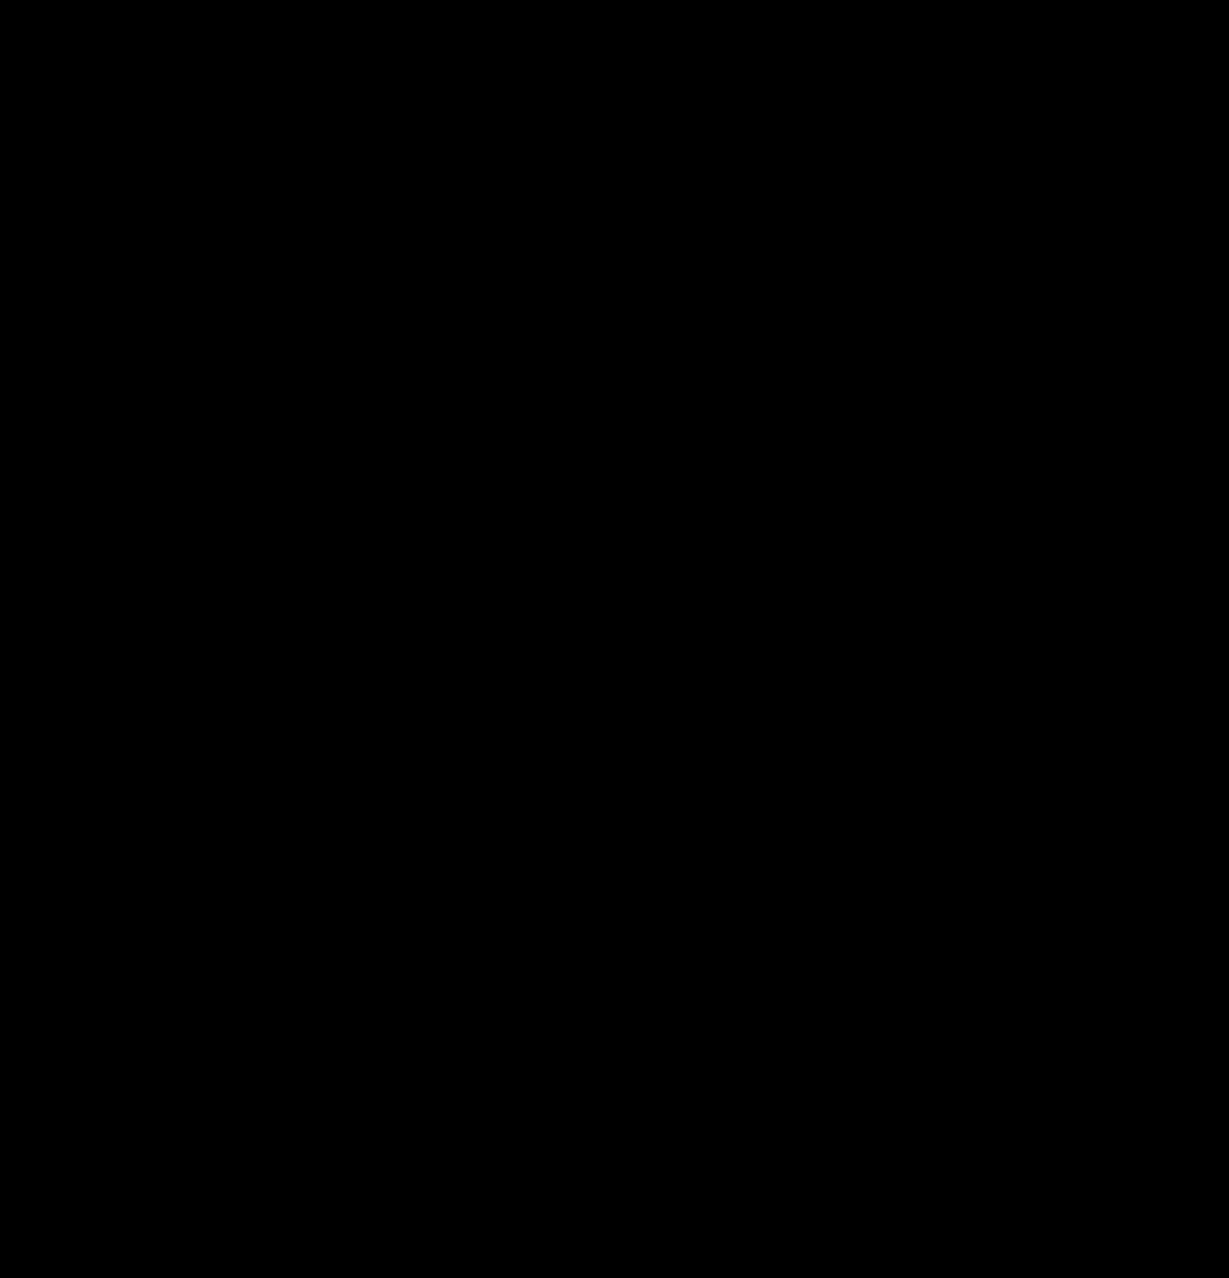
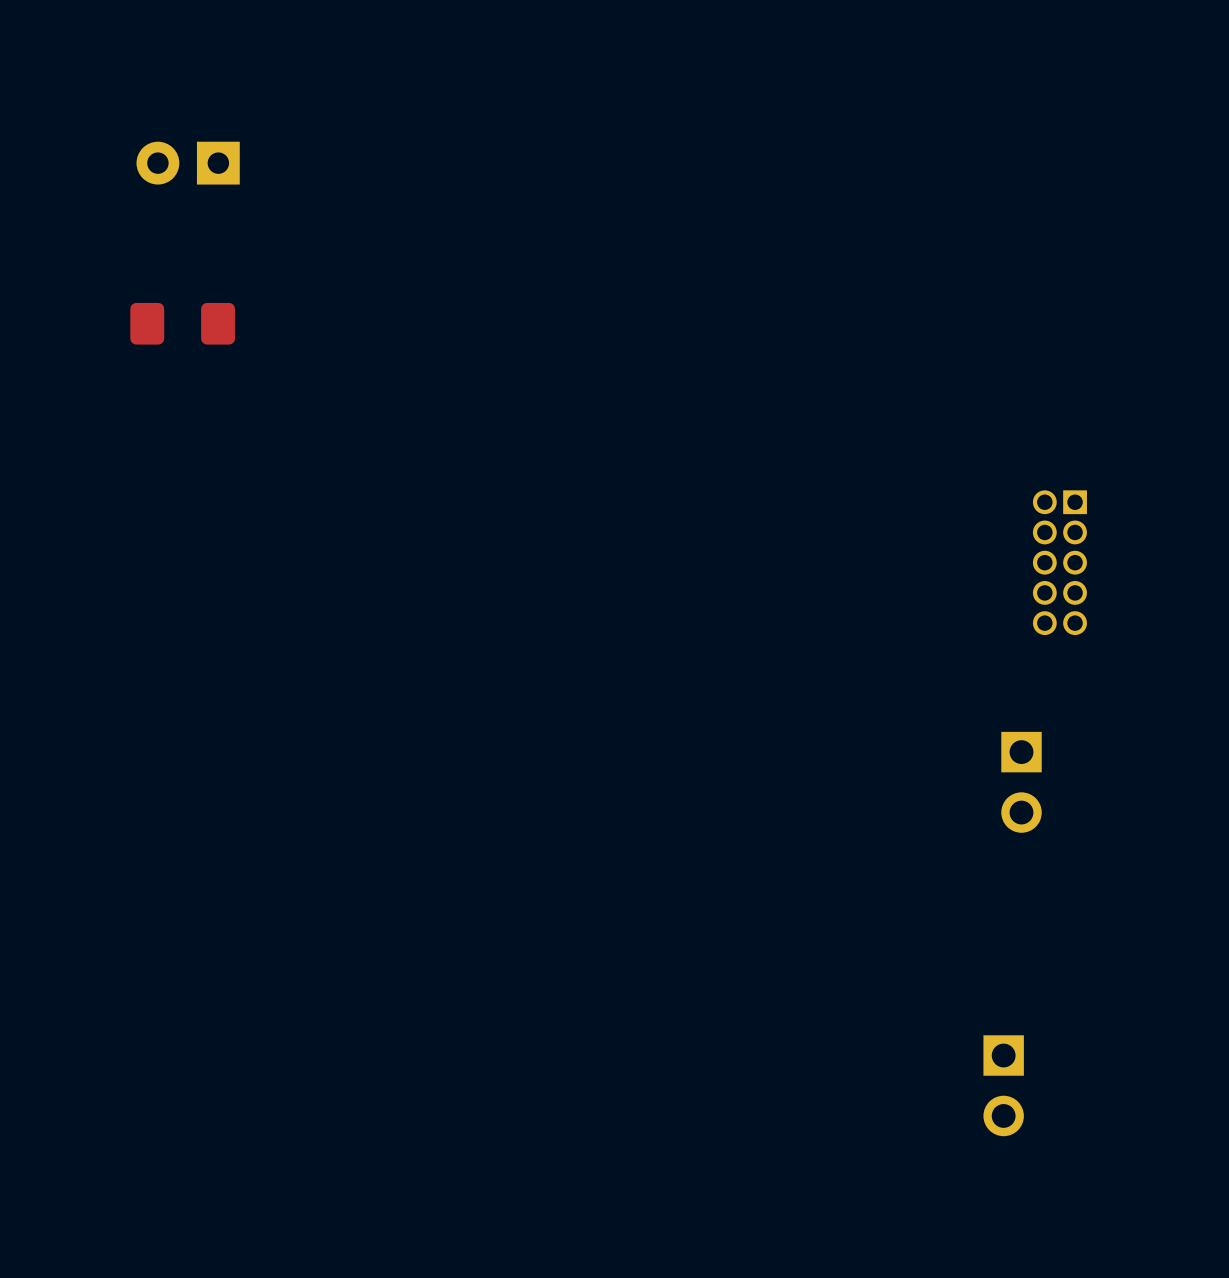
part: none -> (188, 163)
part: none -> (182, 323)
part: none -> (1059, 562)
part: none -> (1021, 782)
part: none -> (1003, 1085)

